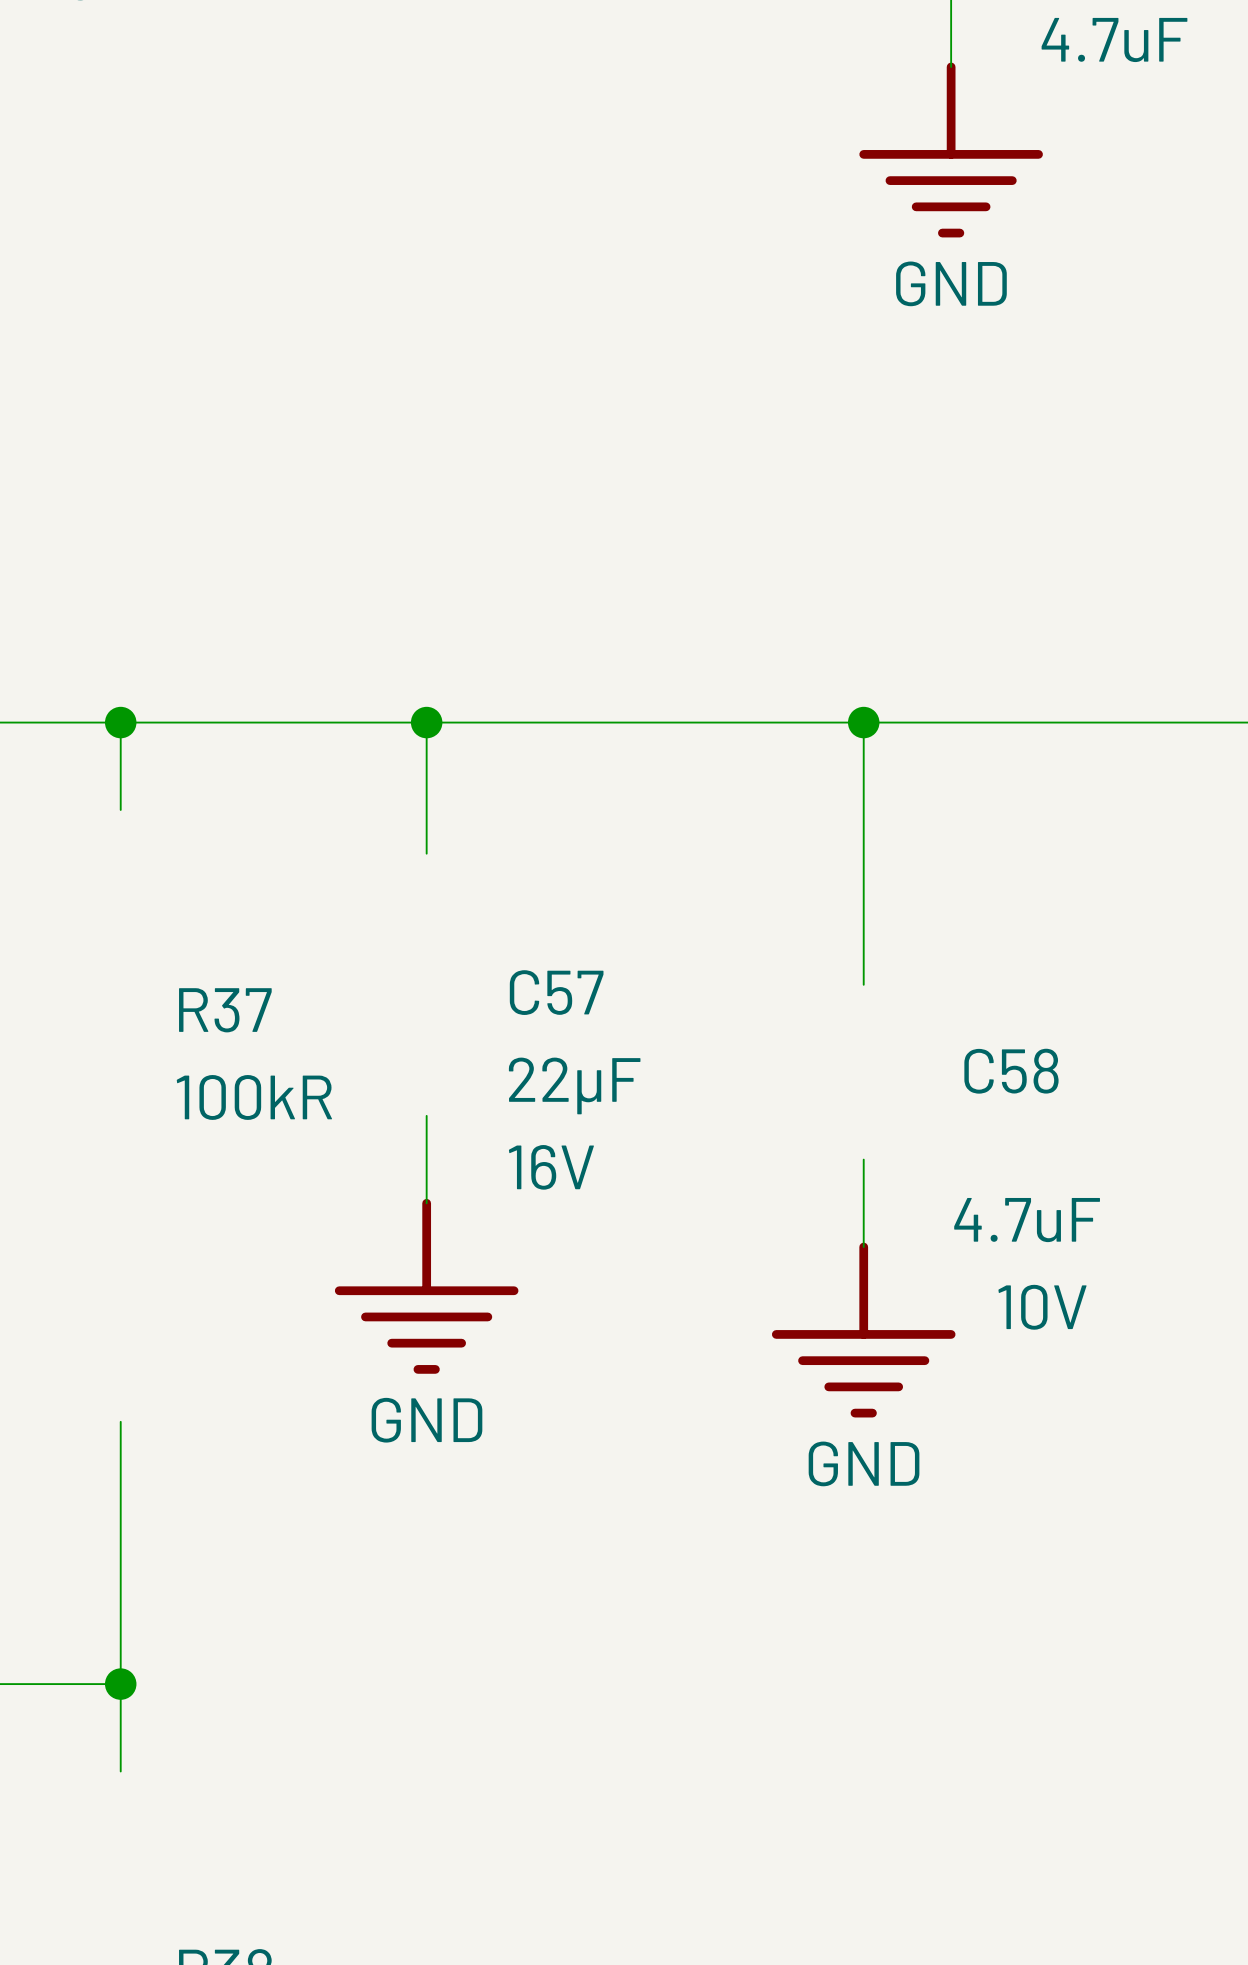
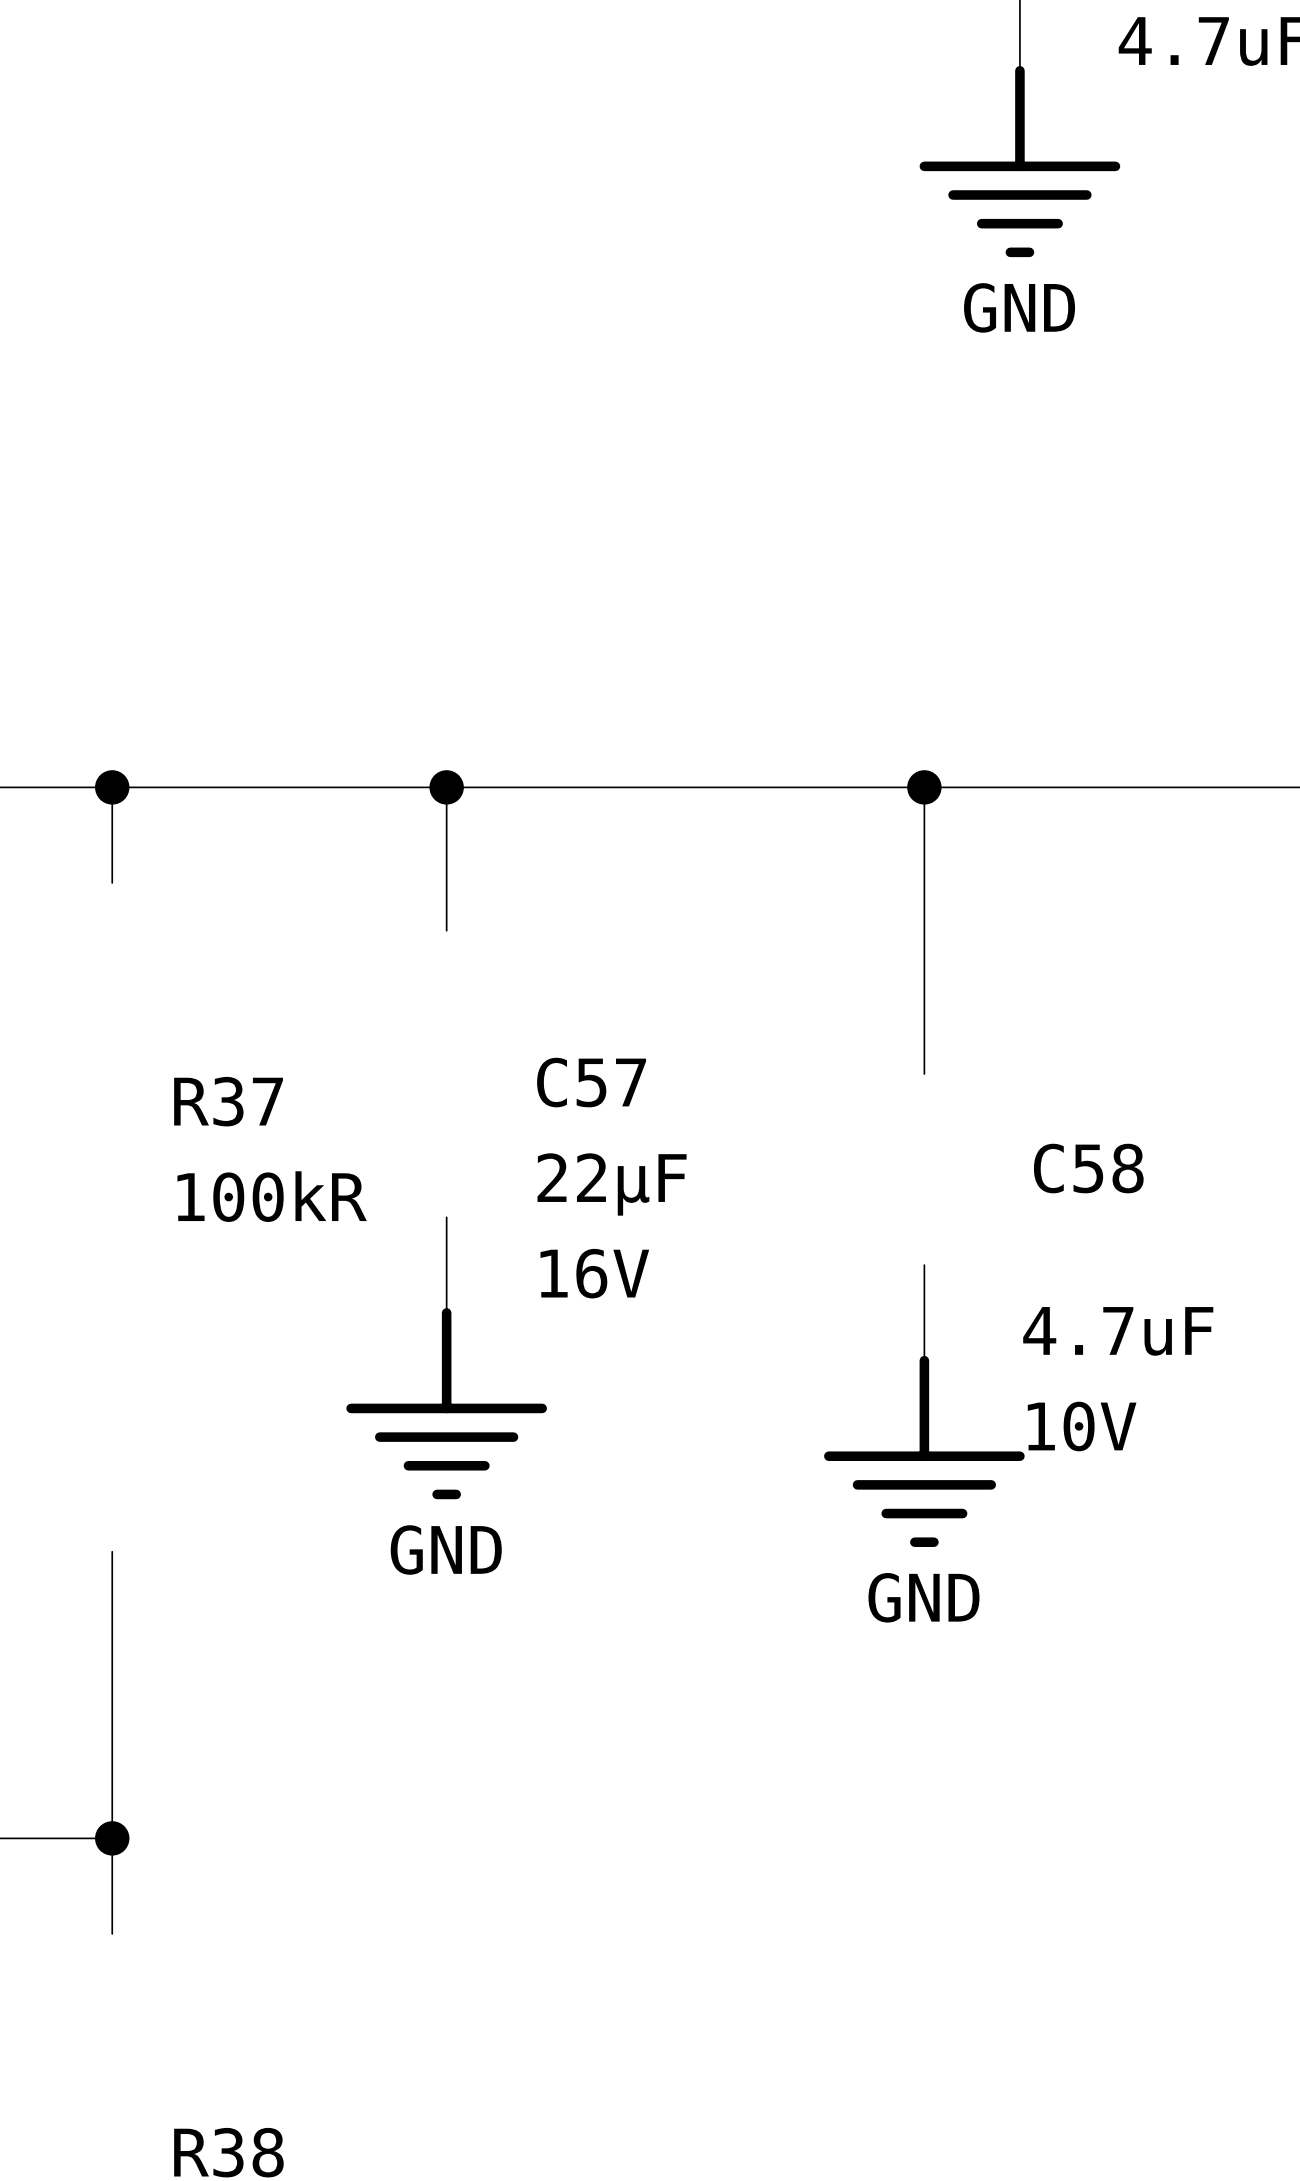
C58 text position: 10V (1042, 1307) -> 10V (1082, 1426)

